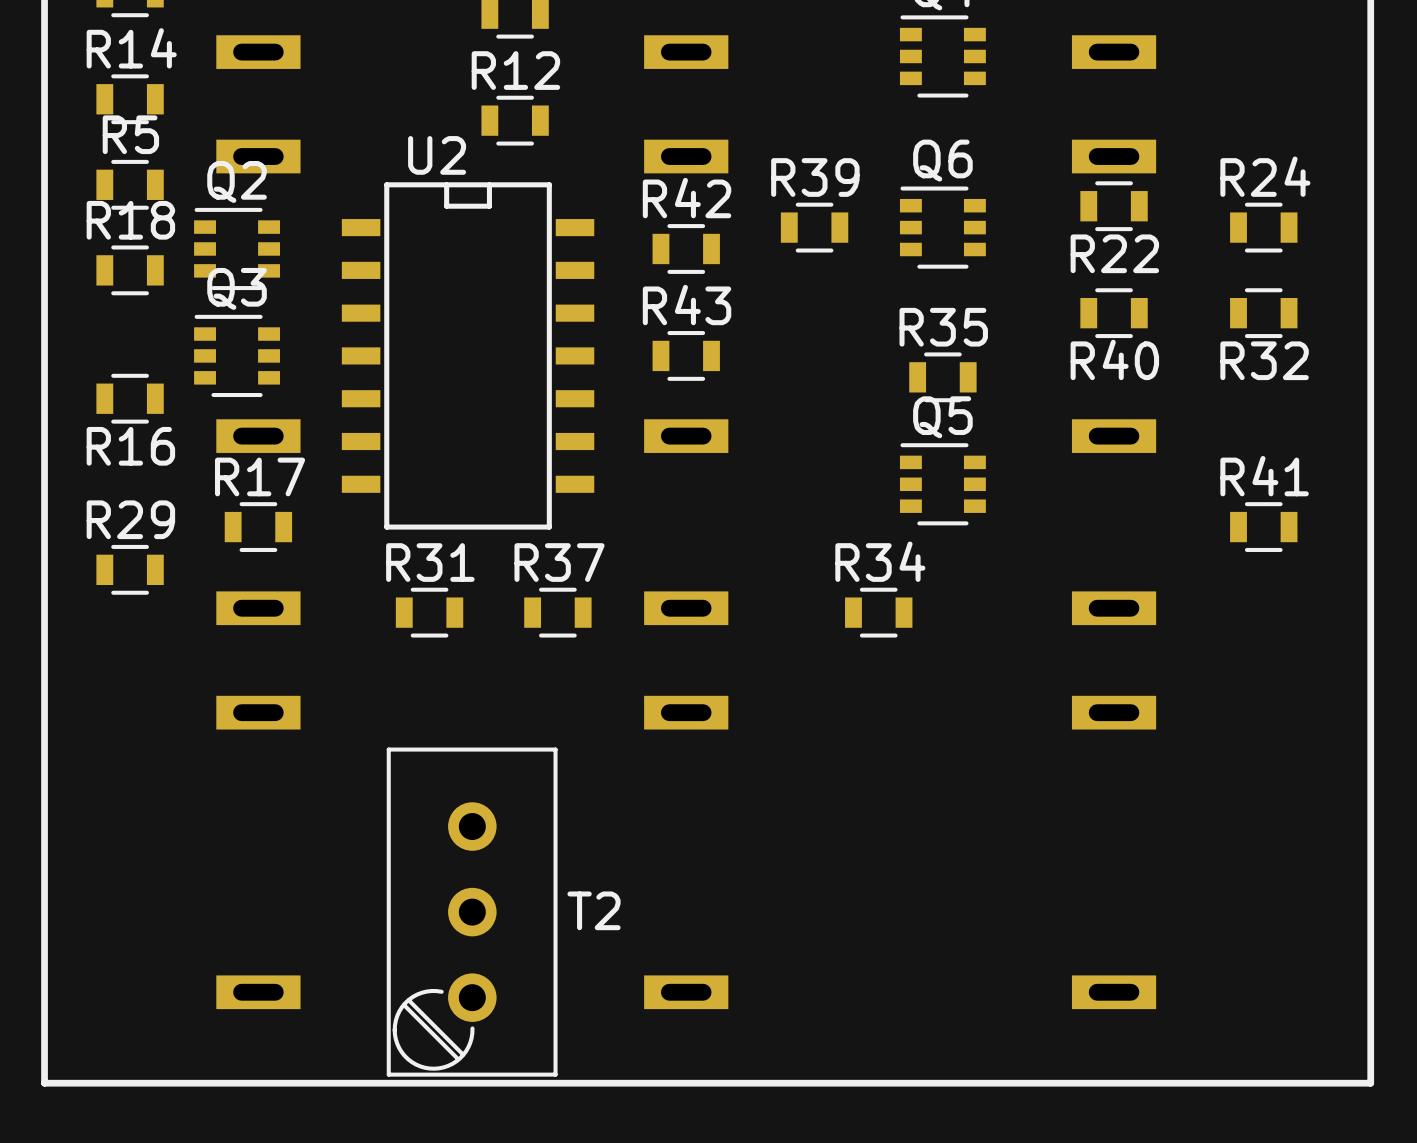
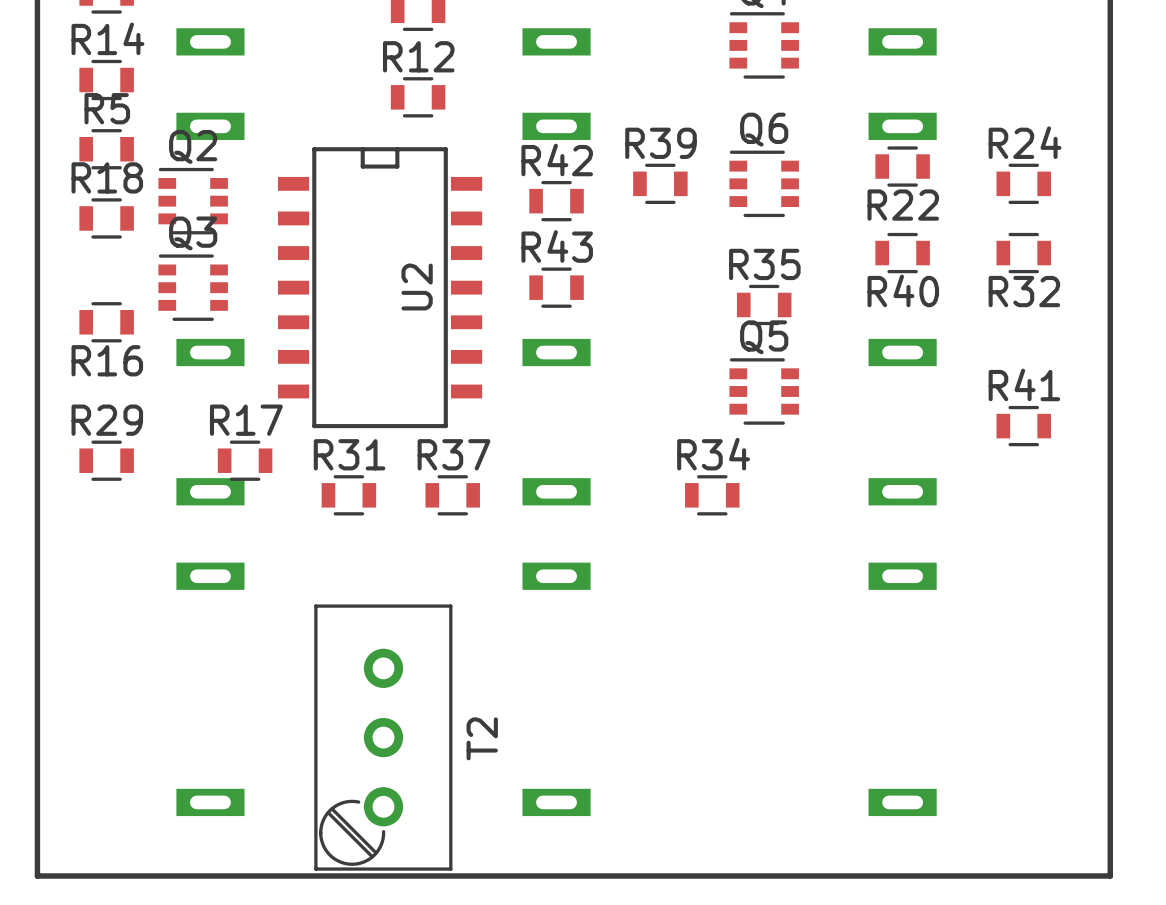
U2 name rotation: 0° (437, 155) -> 90° counterclockwise (417, 287)
U2 name position: U2 (437, 155) -> U2 (417, 287)
R17 position: (258, 527) -> (245, 460)
T2 name rotation: 0° (594, 910) -> 90° counterclockwise (482, 738)

